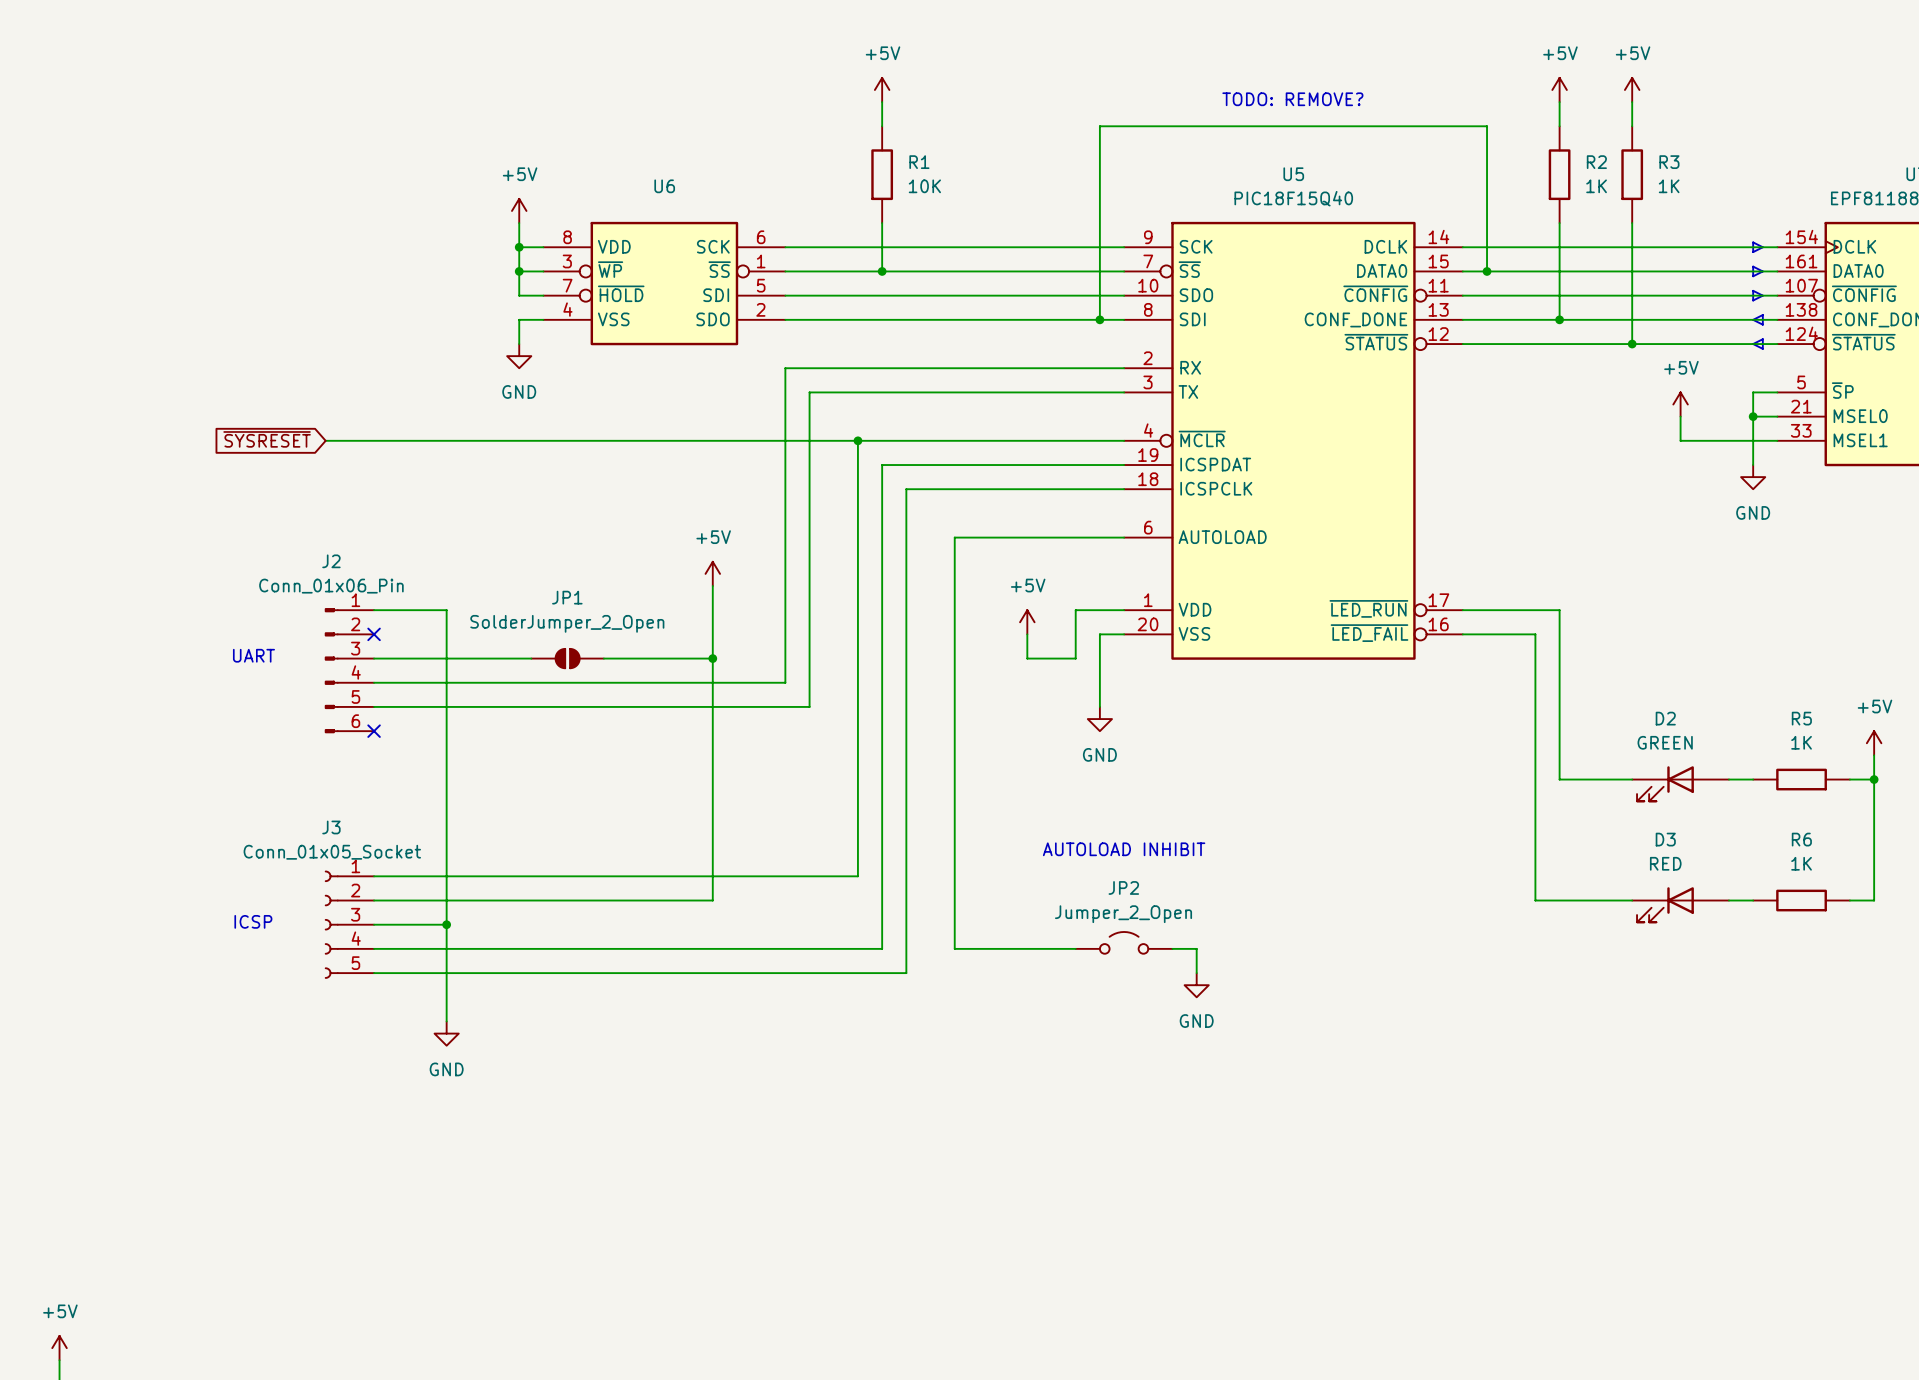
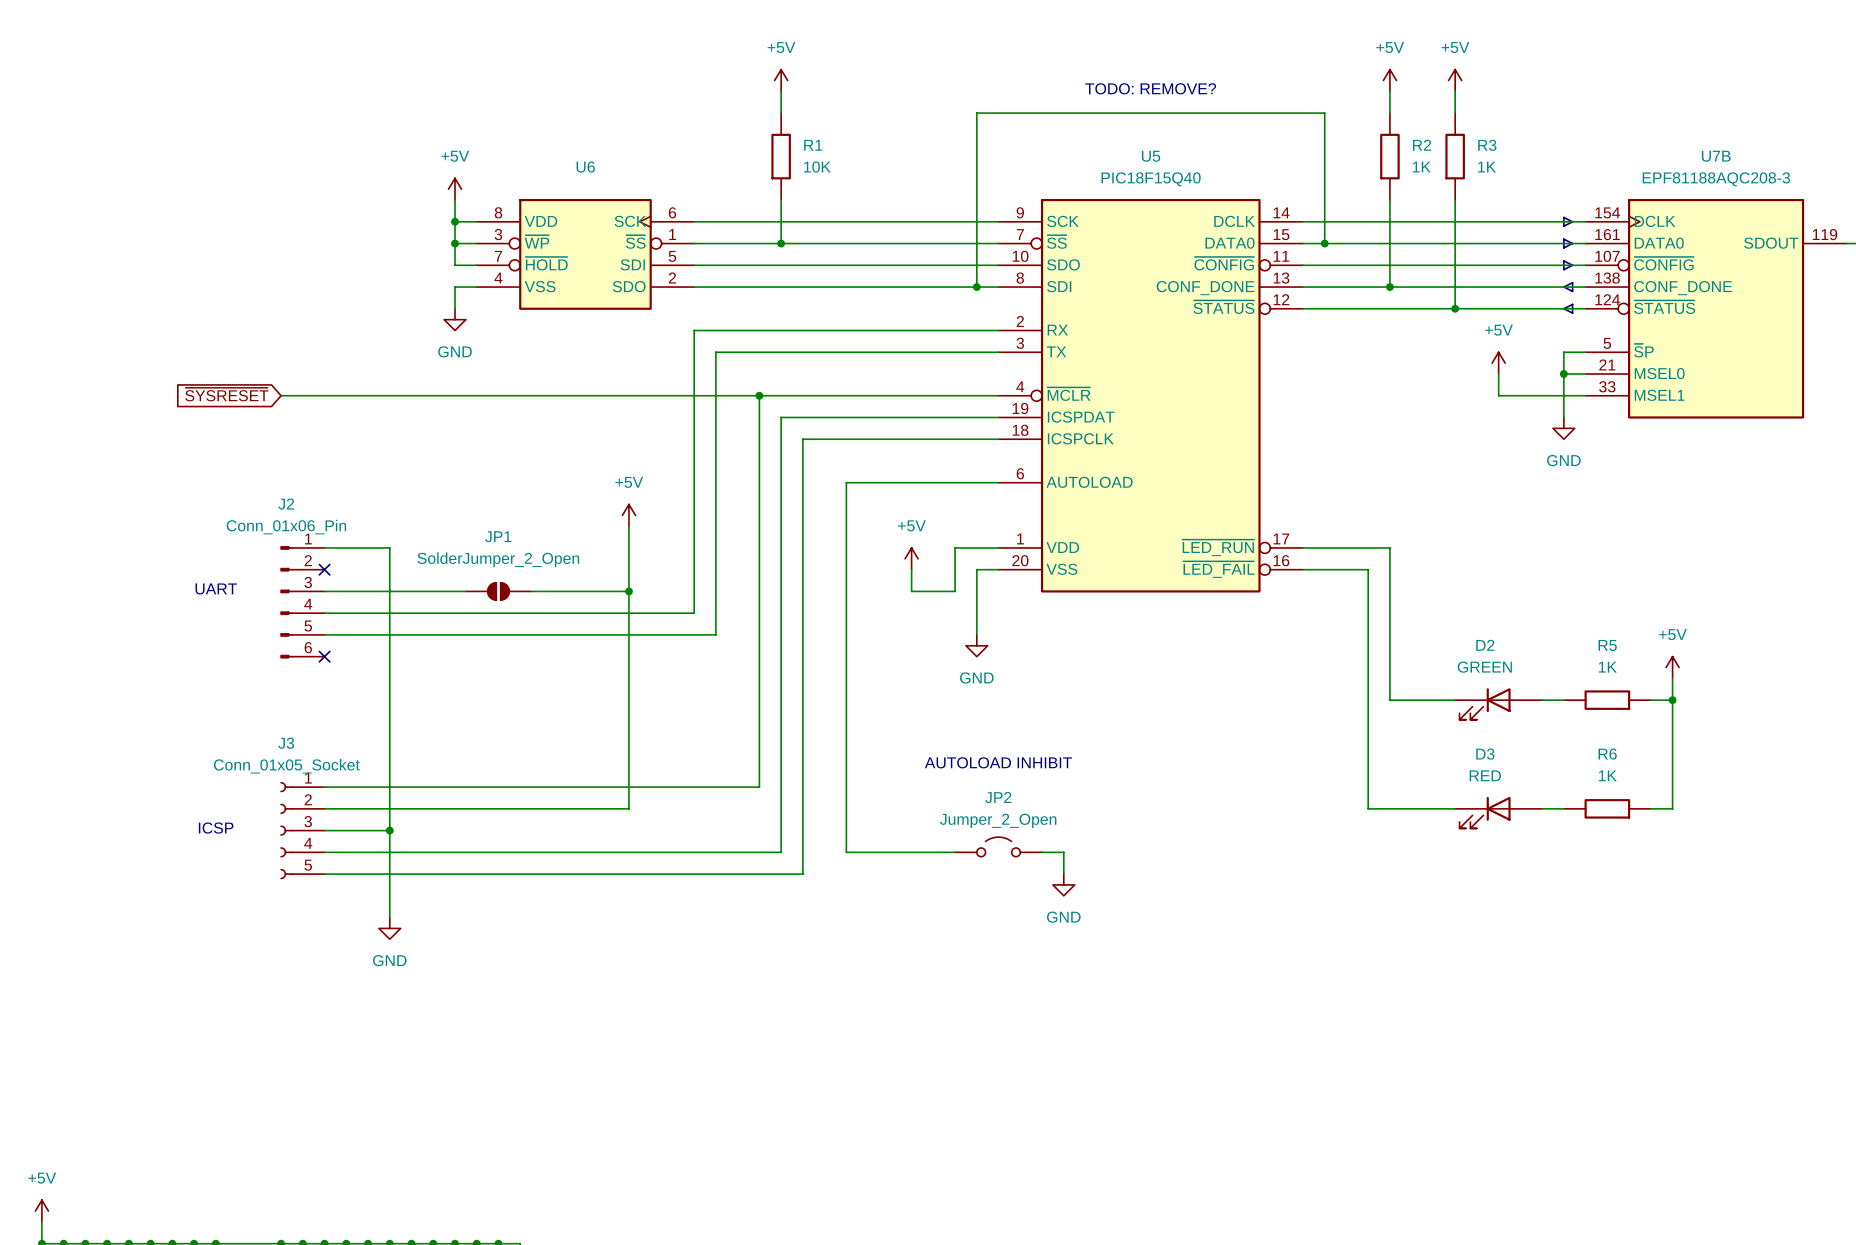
U6 symbol: [543, 221, 786, 346] -> [476, 198, 695, 310]

